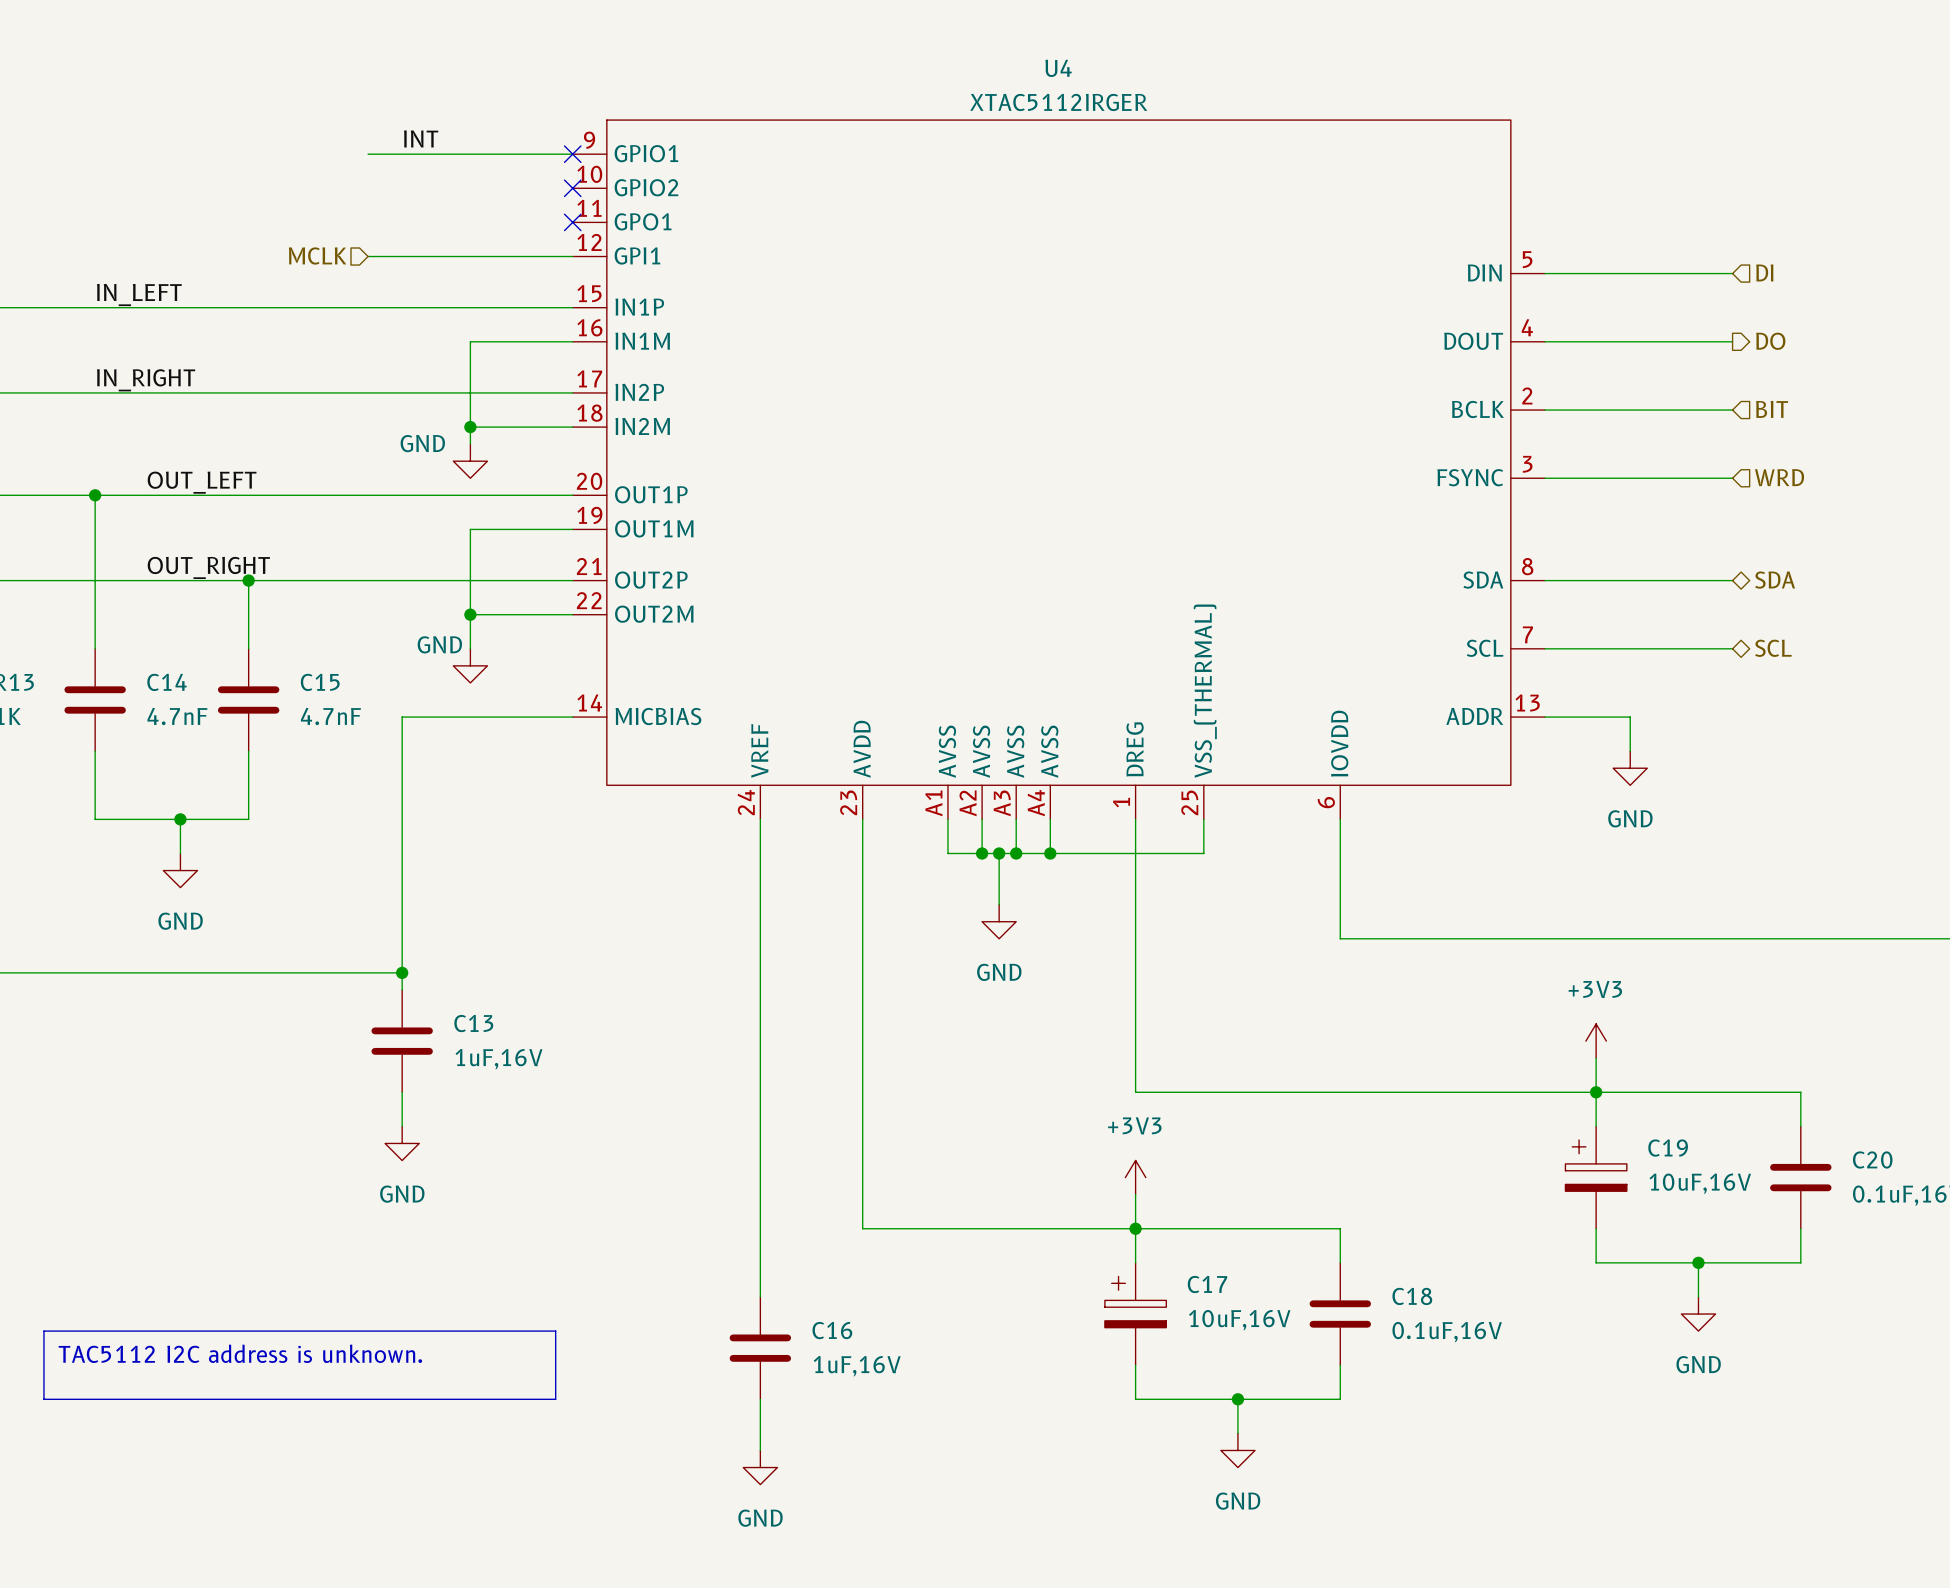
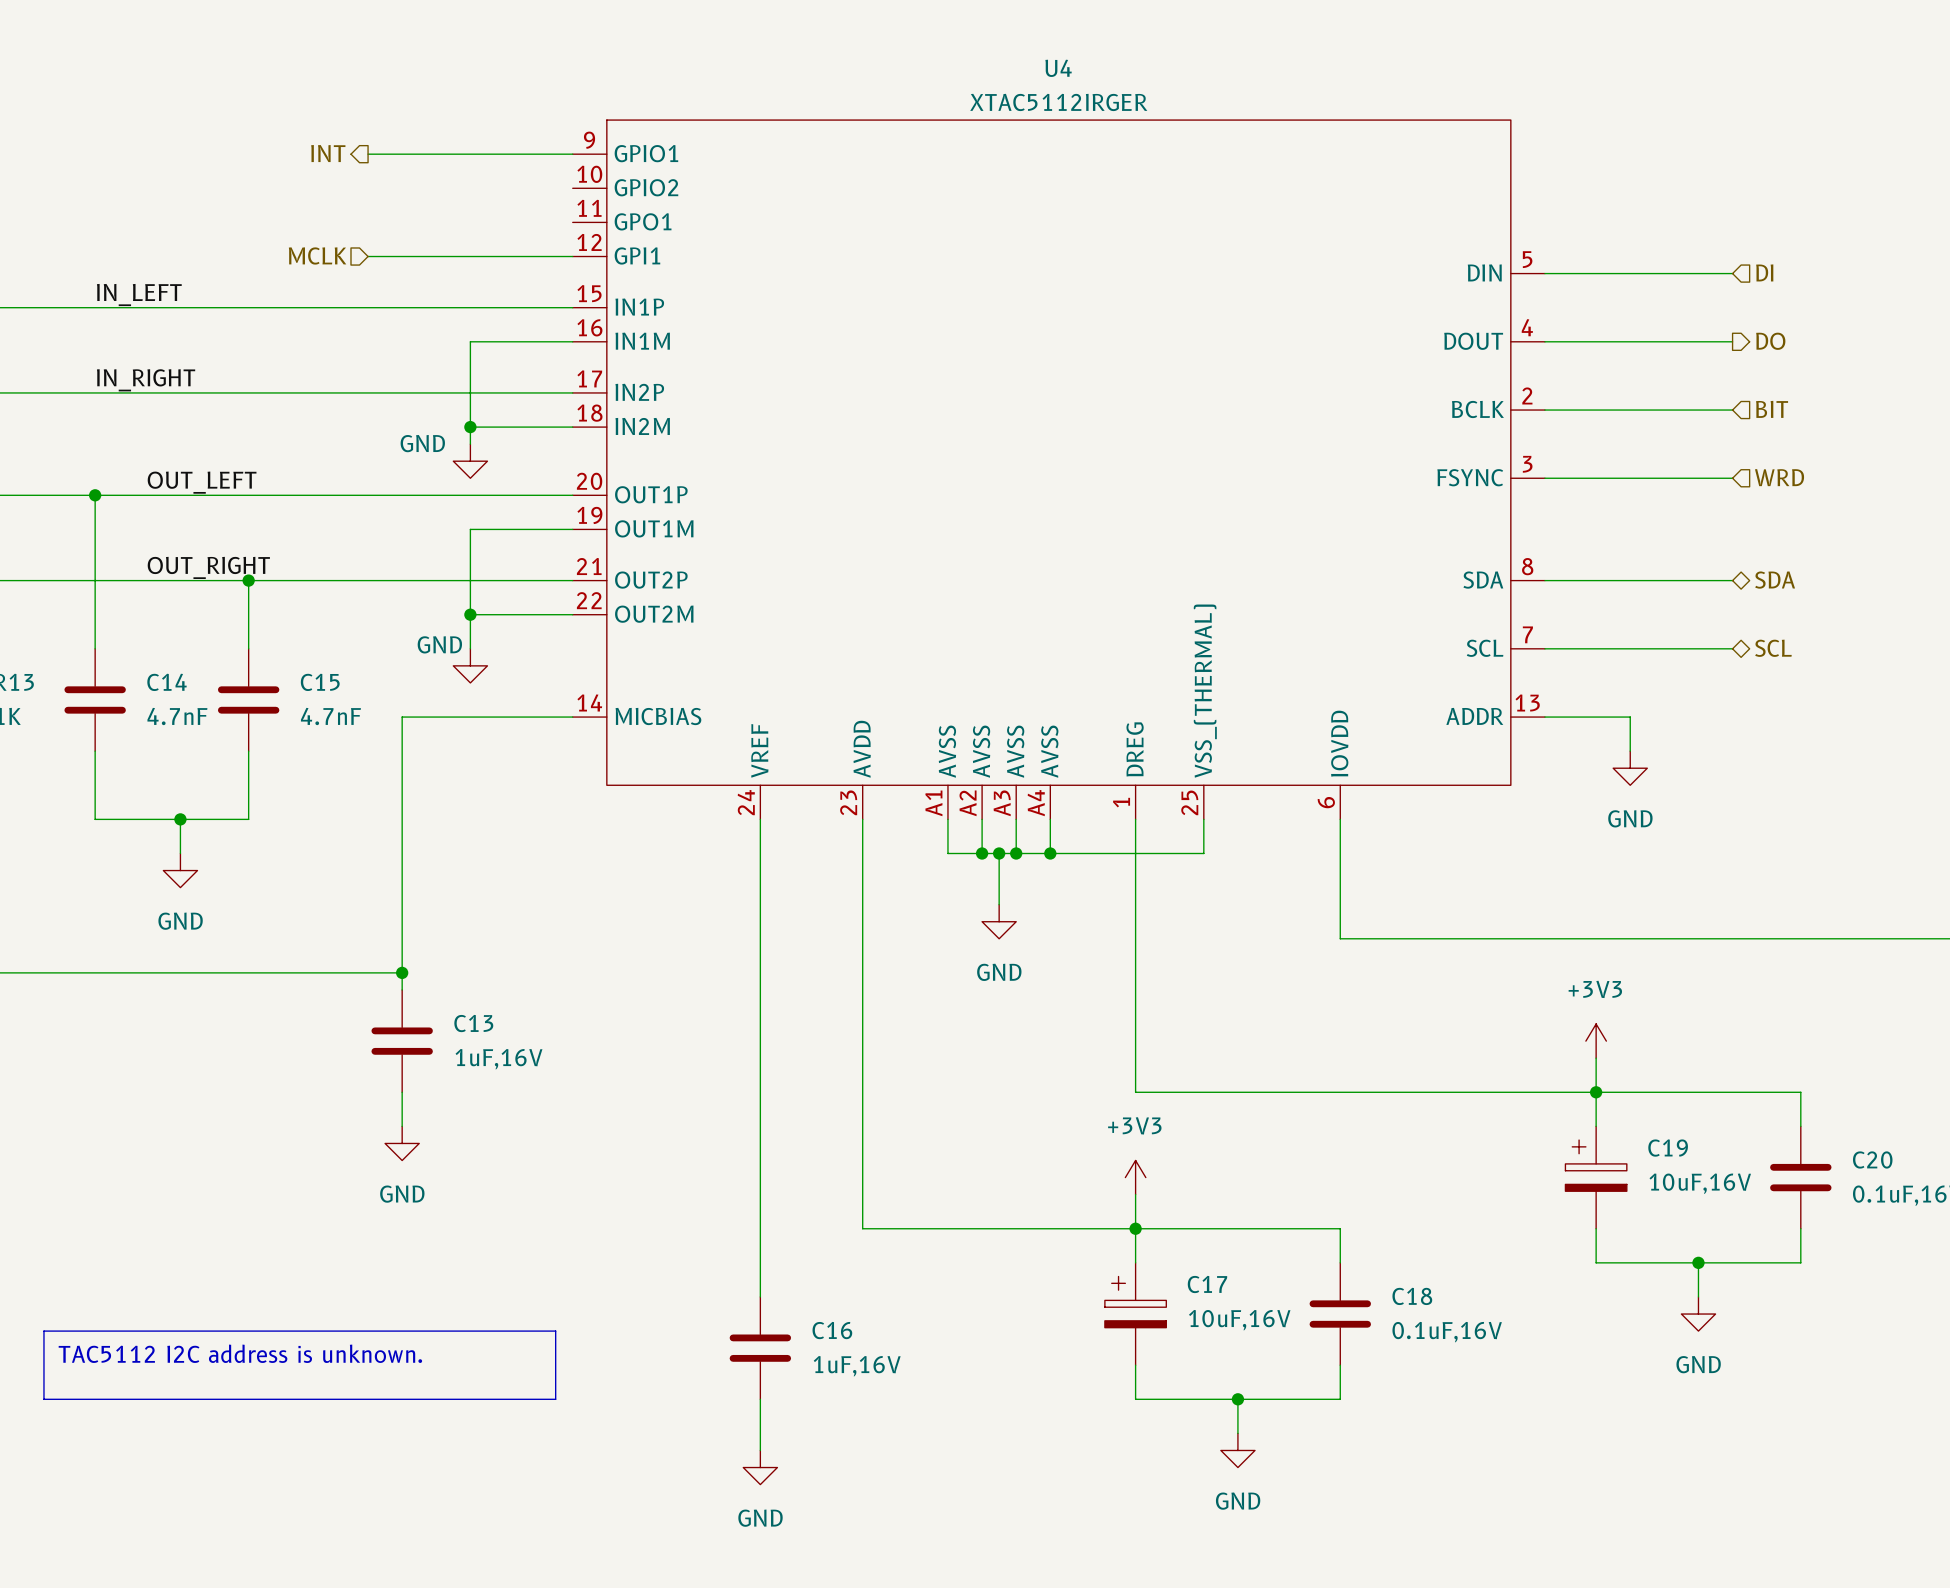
label: INT (421, 138) -> none
hierarchical label: none -> INT (328, 153)
no-connect mark: (572, 154) -> none
no-connect mark: (572, 188) -> none
no-connect mark: (572, 222) -> none

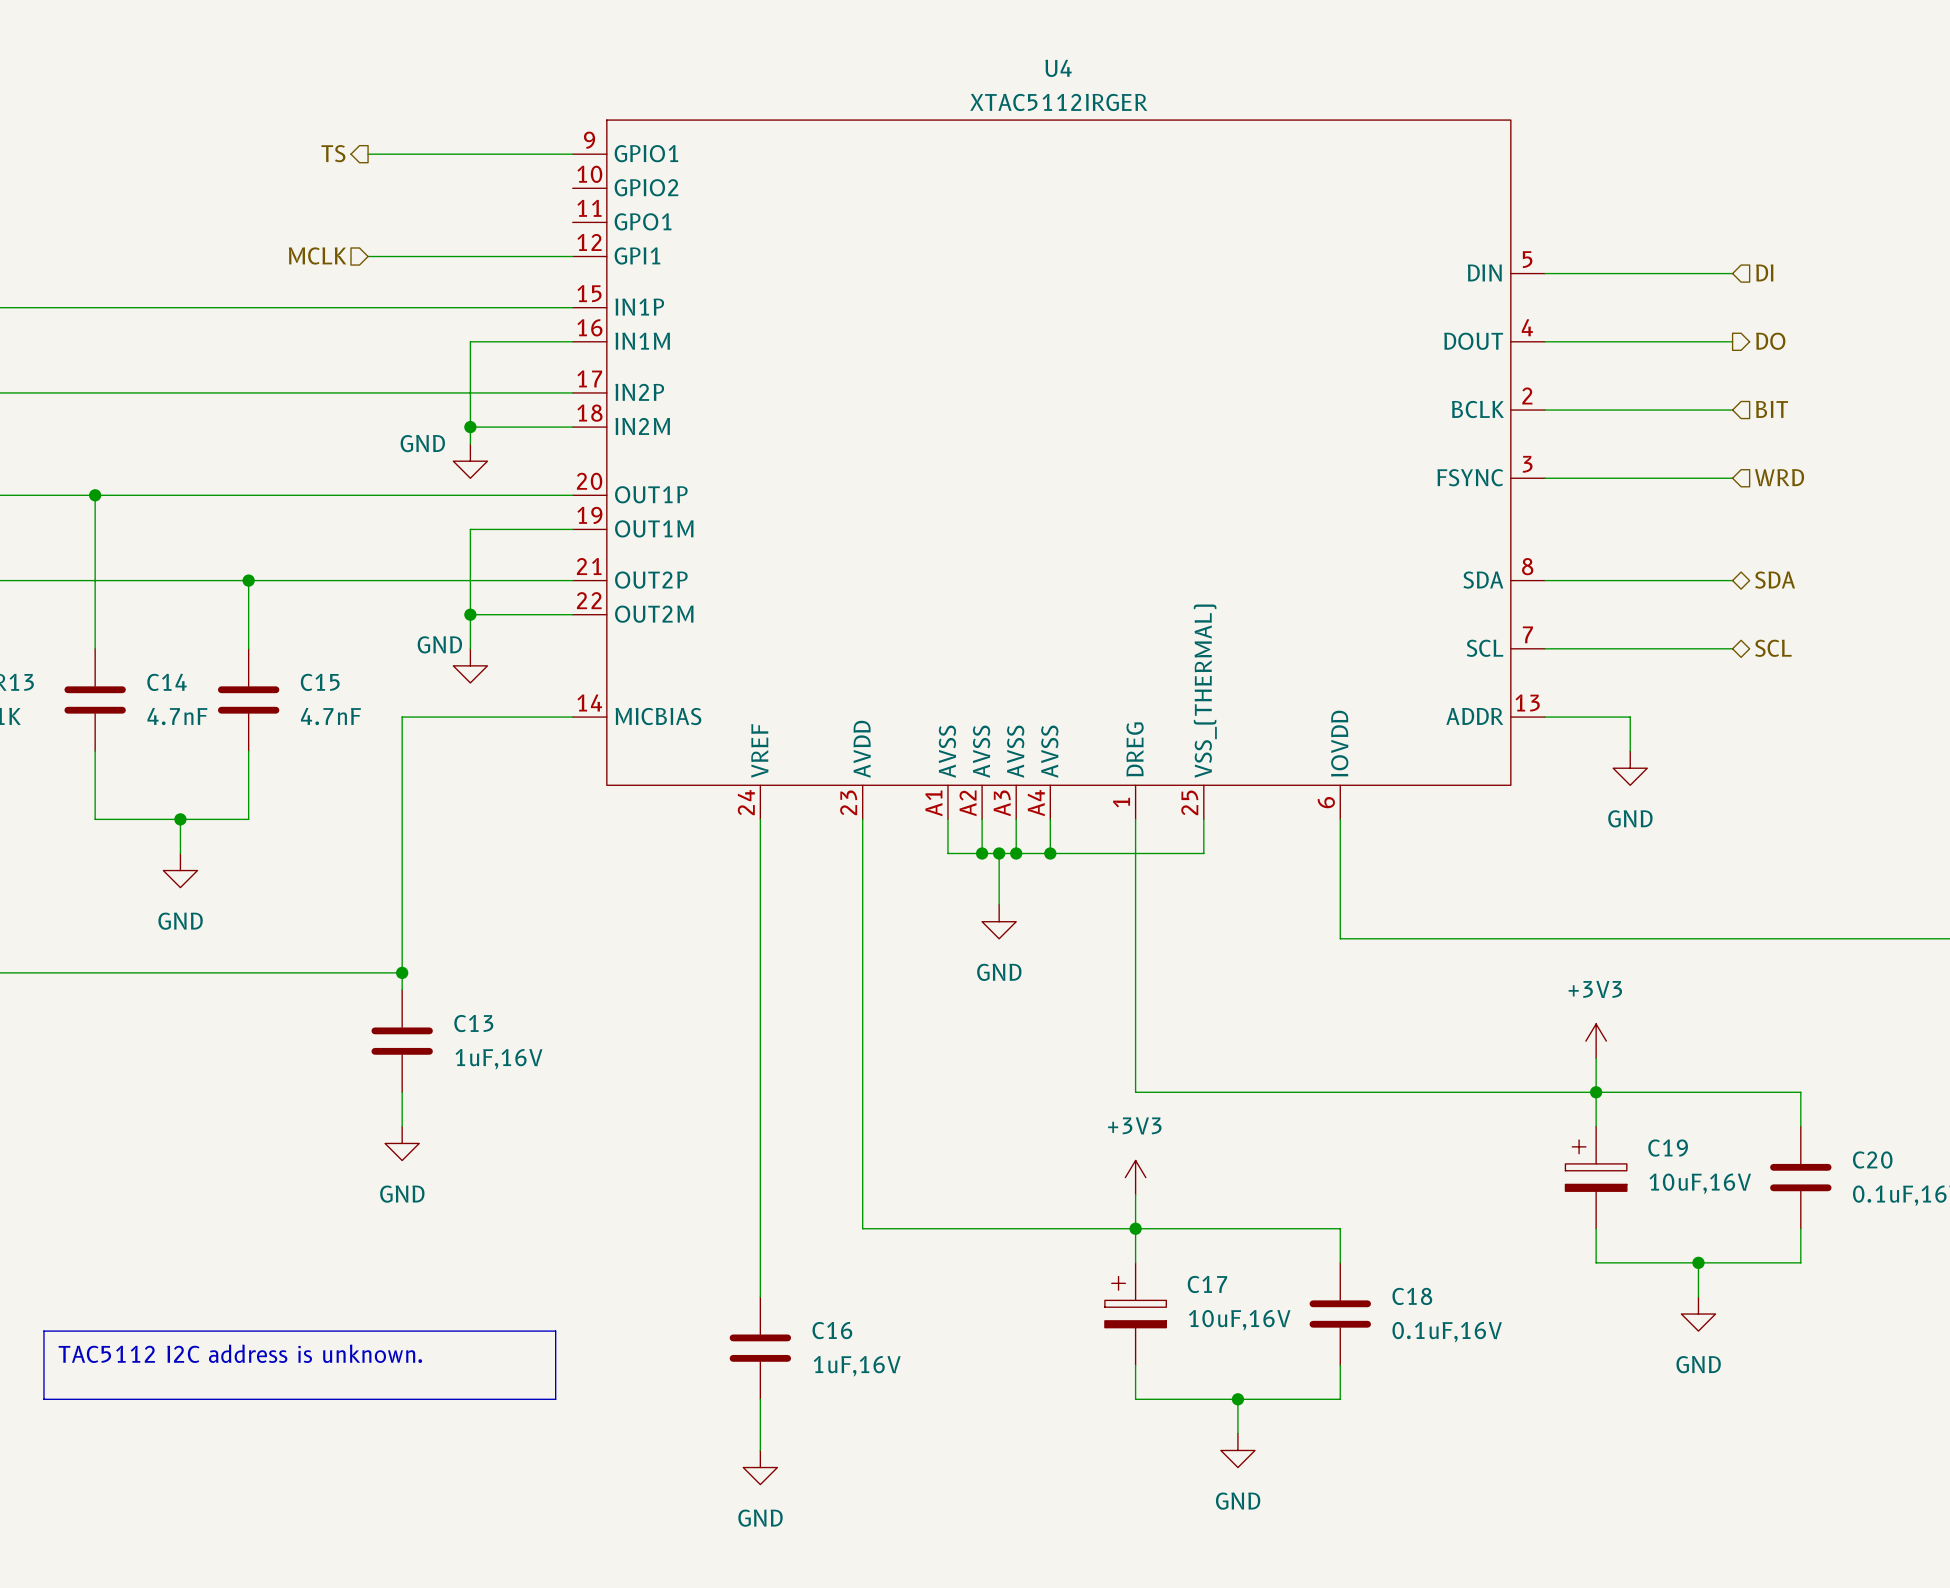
hierarchical label: INT (328, 153) -> TS (333, 153)
label: IN_LEFT (139, 295) -> none
label: IN_RIGHT (146, 380) -> none
label: OUT_LEFT (202, 482) -> none
label: OUT_RIGHT (208, 567) -> none

